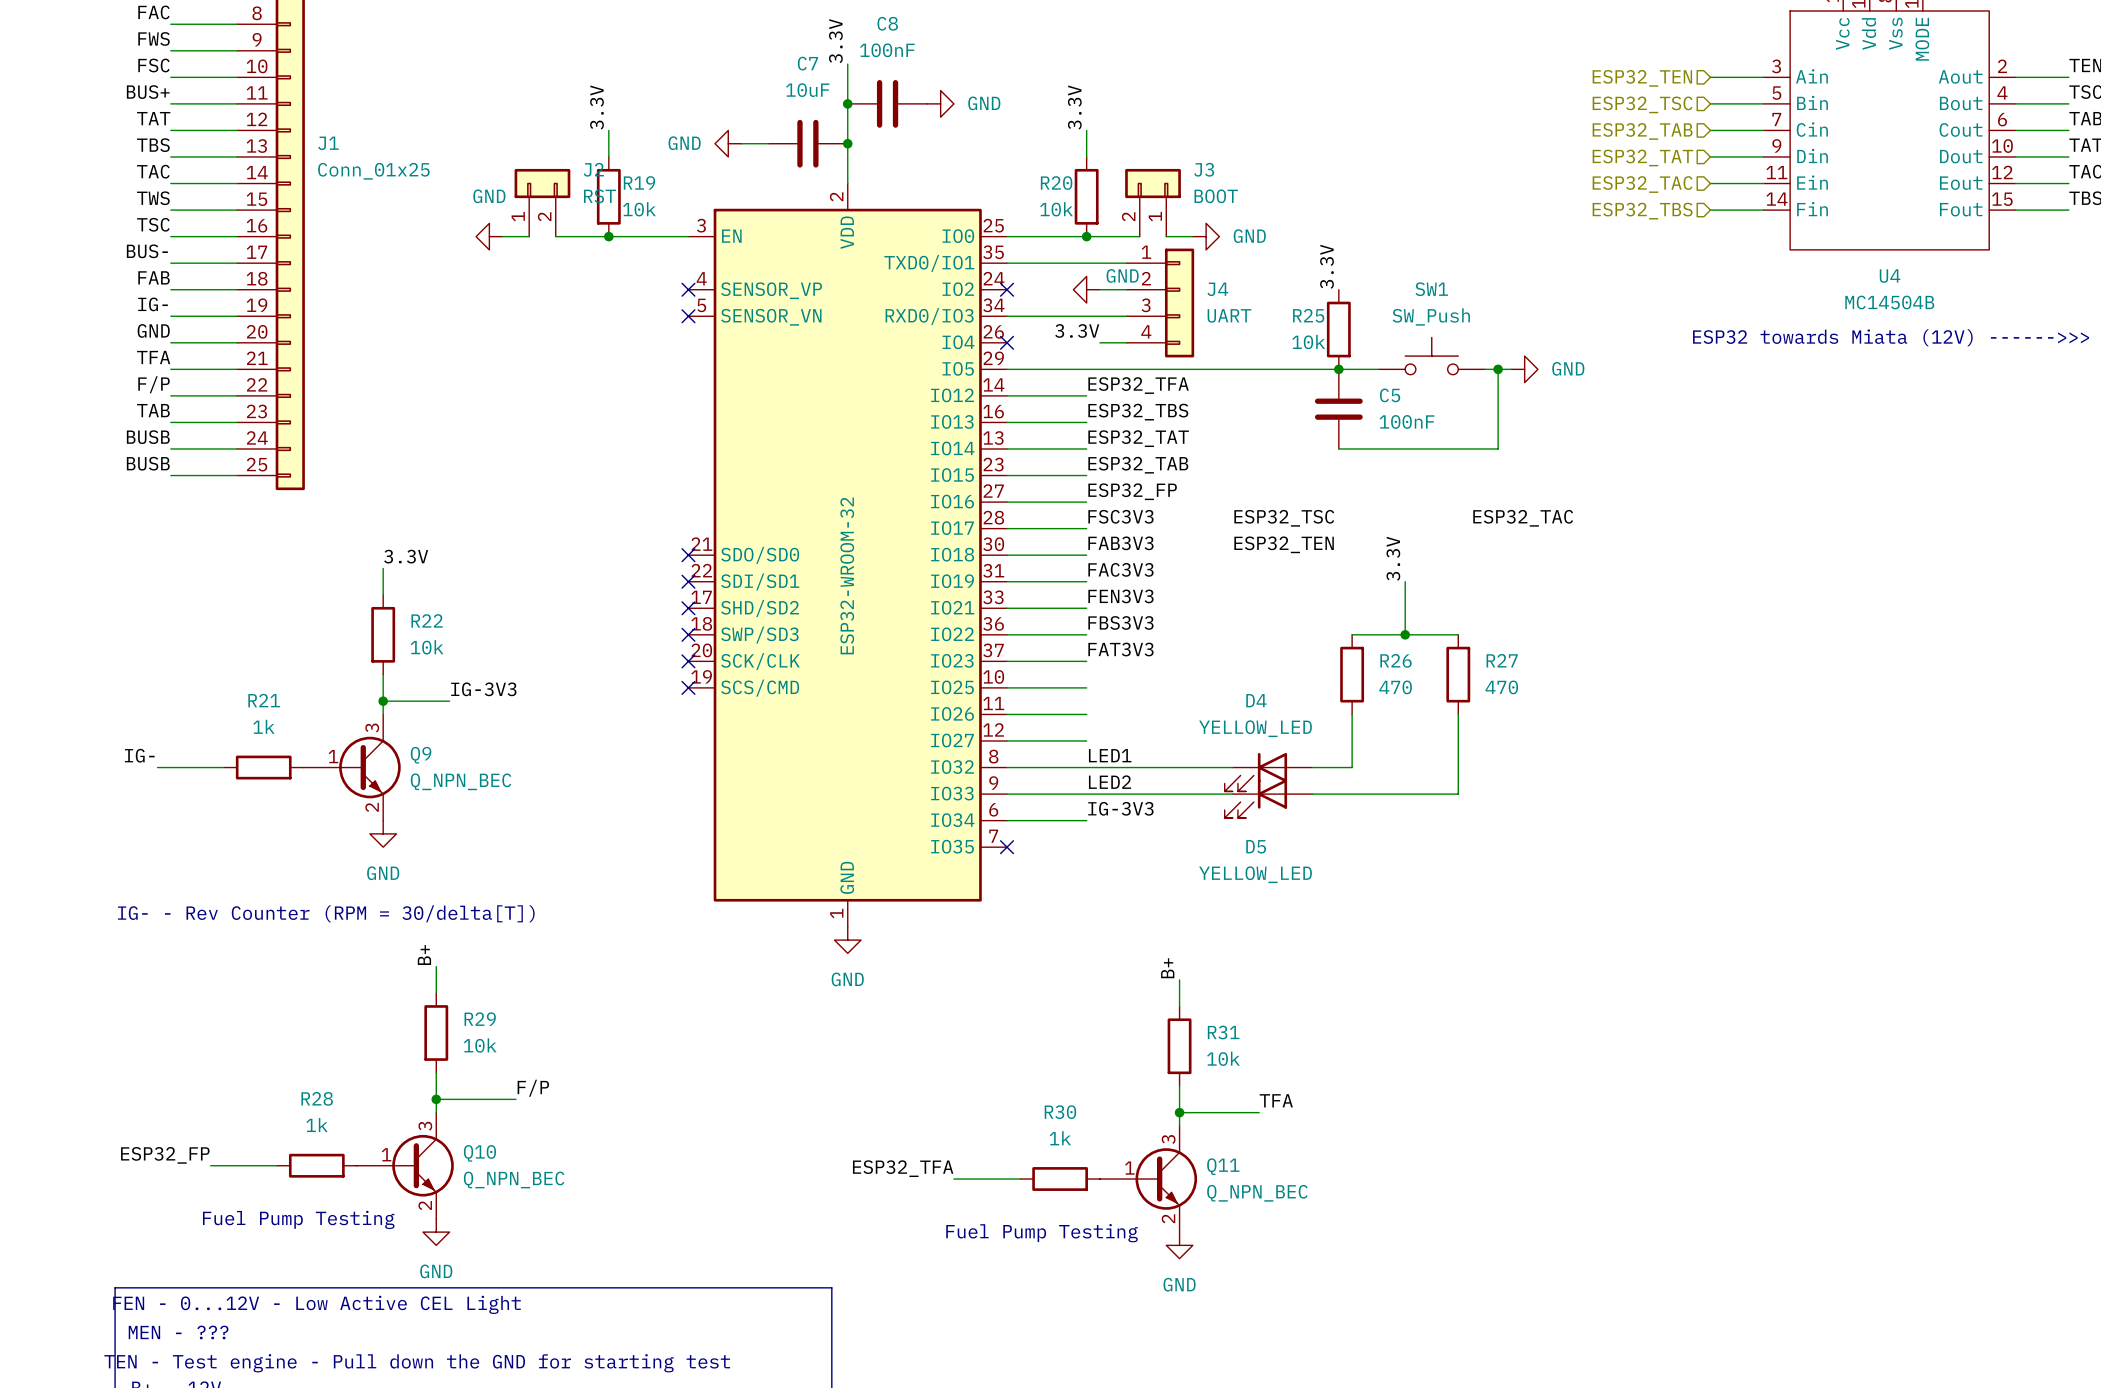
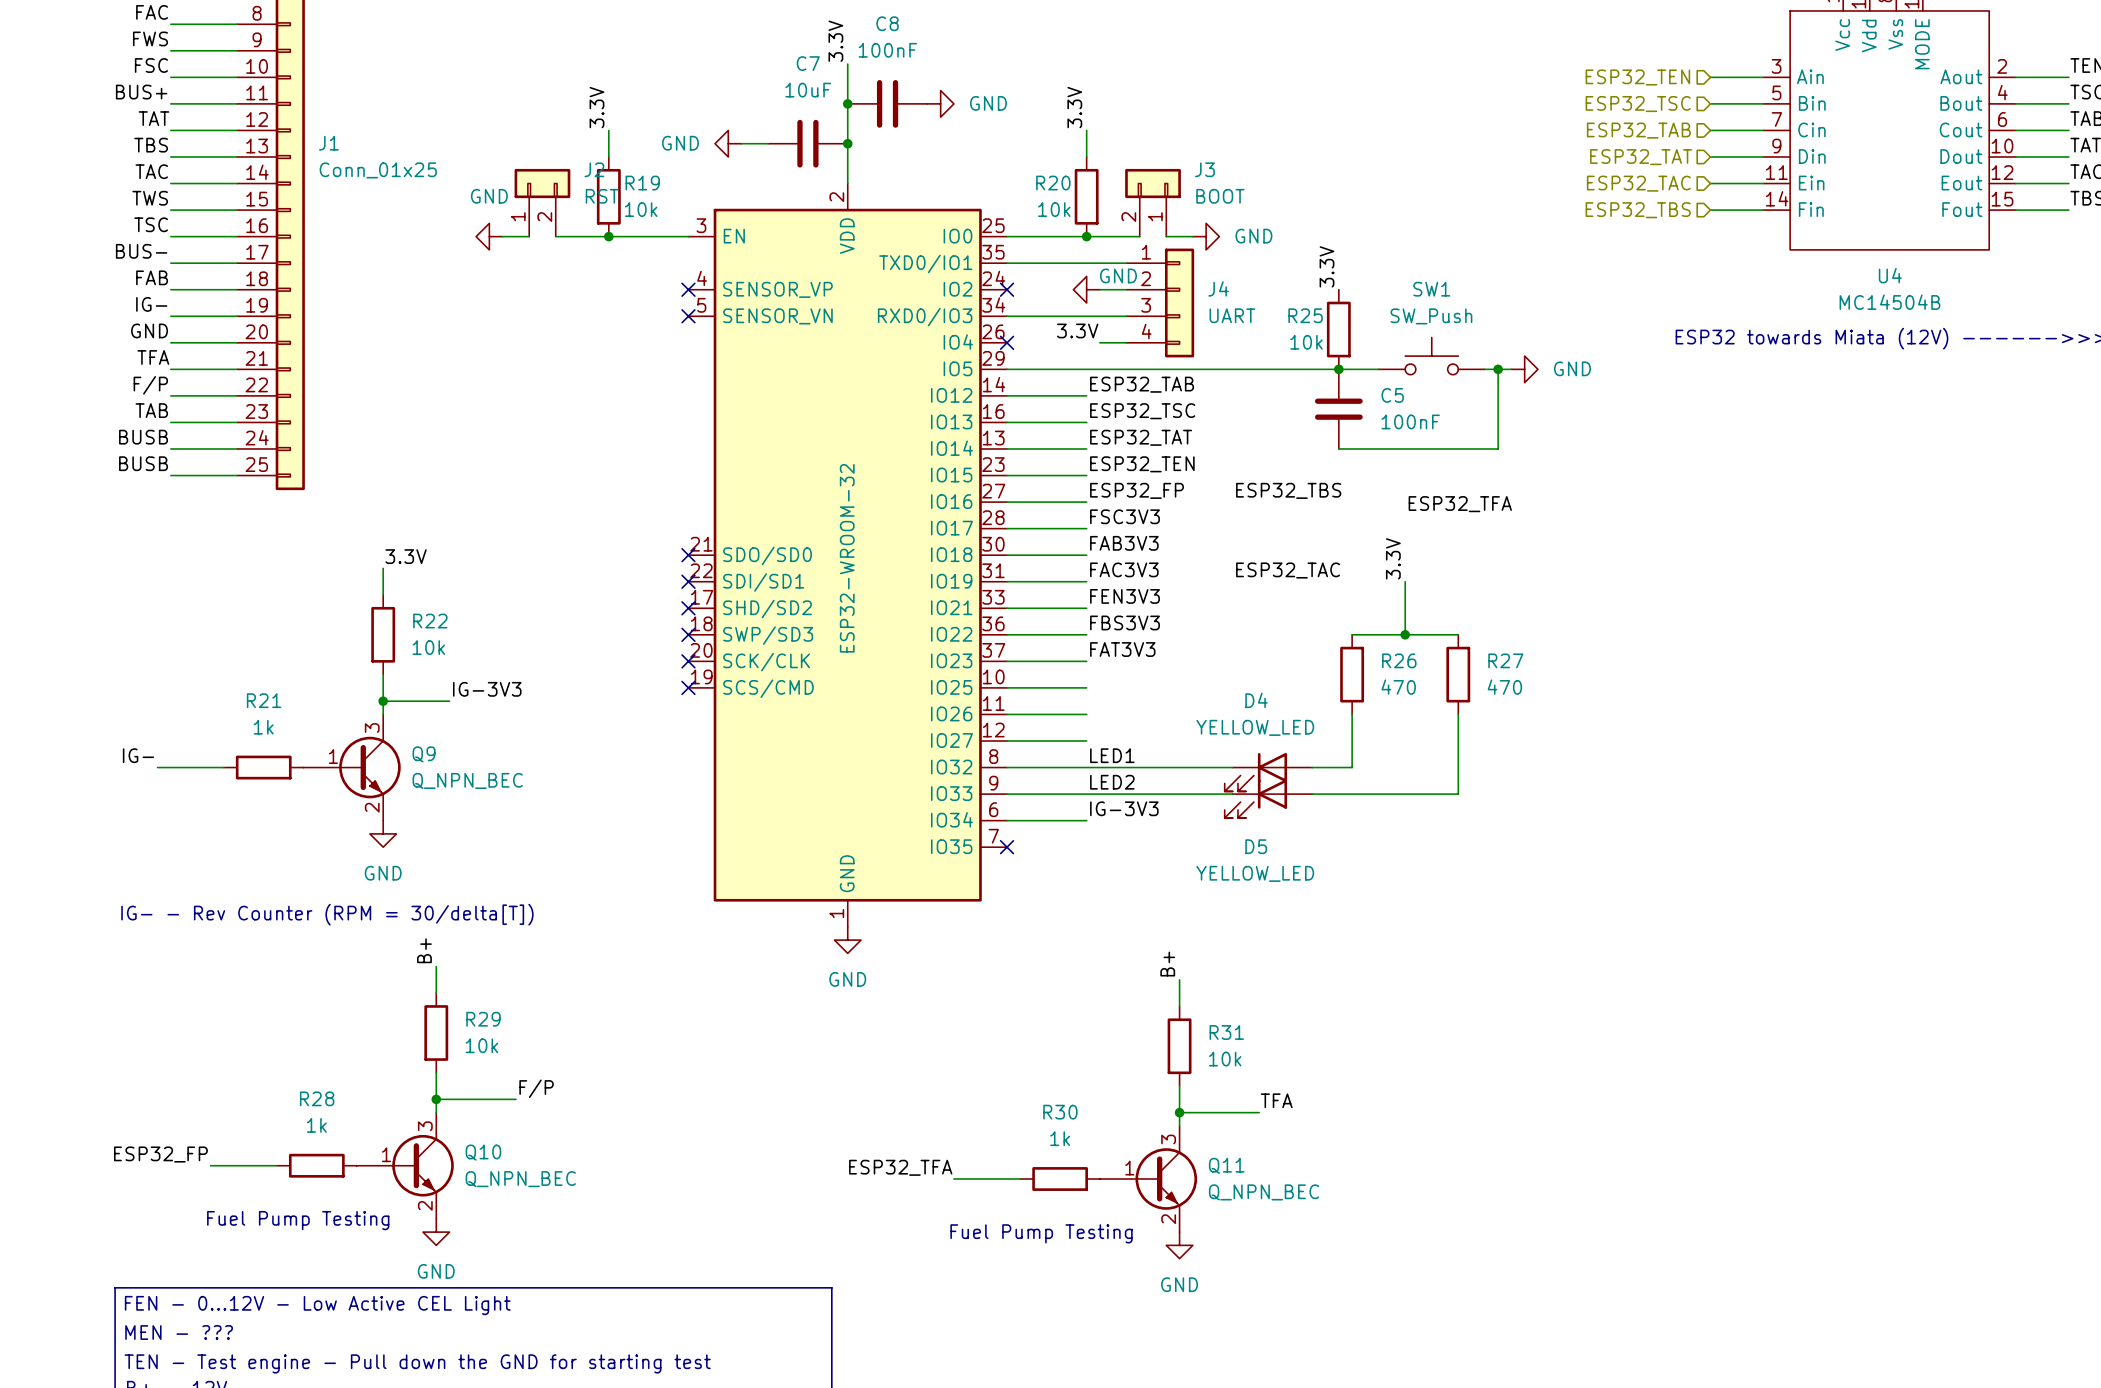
label: ESP32_TFA (1138, 385) -> ESP32_TAB (1142, 384)
label: ESP32_TBS (1138, 412) -> ESP32_TSC (1142, 411)
label: ESP32_TAB (1138, 465) -> ESP32_TEN (1142, 464)
label: none -> ESP32_TFA (1460, 504)
label: ESP32_TSC (1284, 518) -> ESP32_TBS (1288, 490)
label position: ESP32_TAC (1523, 518) -> ESP32_TAC (1288, 570)
label: ESP32_TEN (1284, 544) -> none

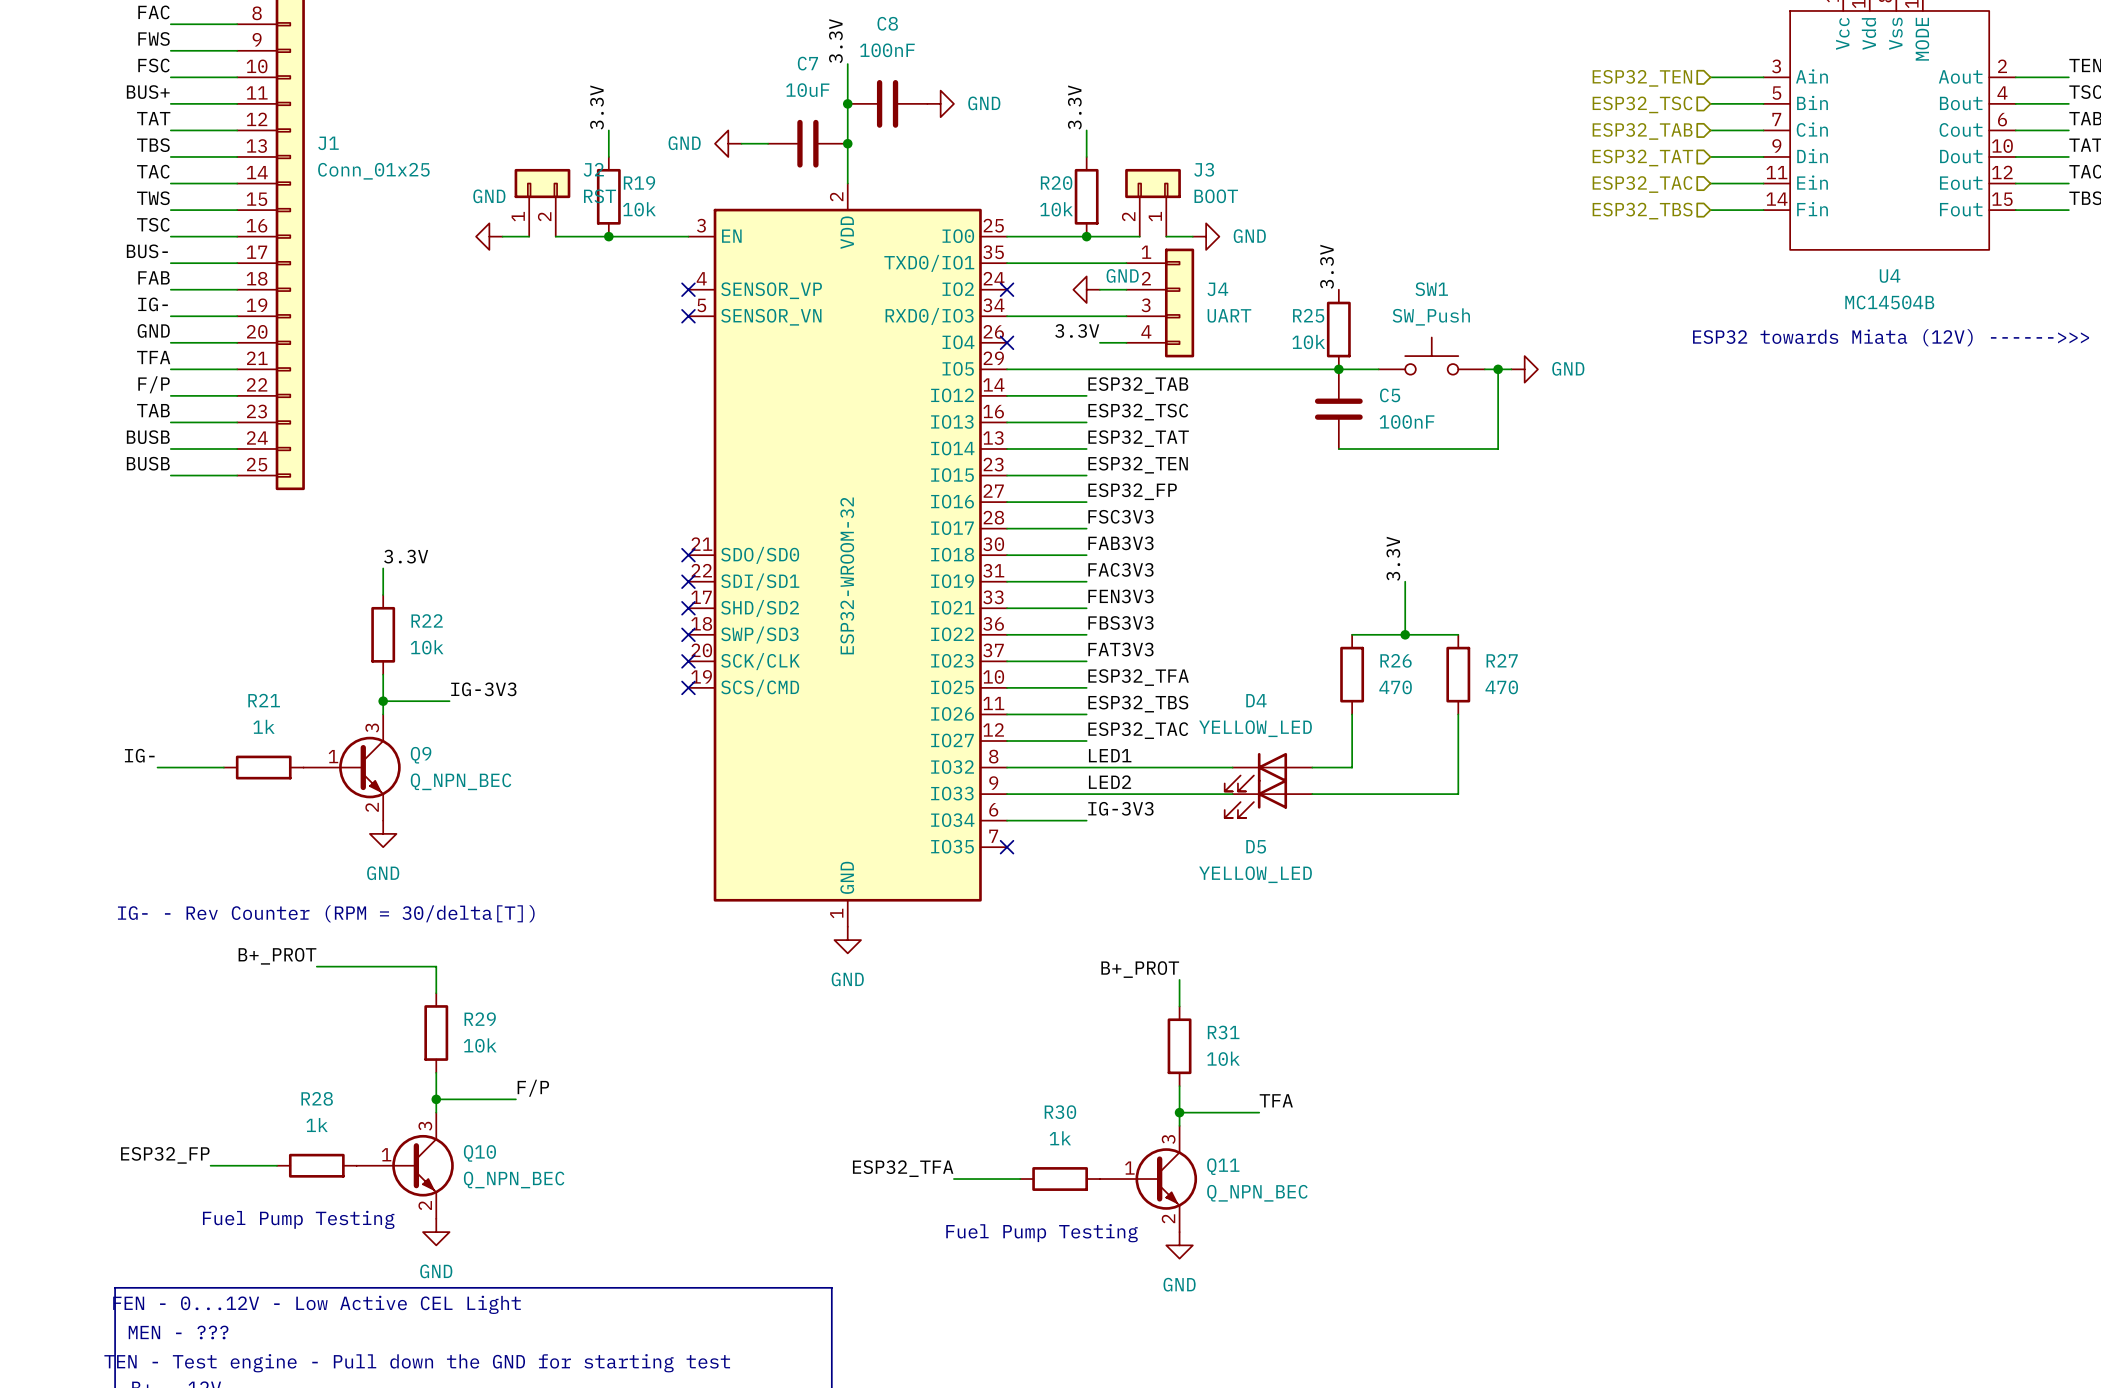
label position: ESP32_TBS (1288, 490) -> ESP32_TBS (1138, 704)
label: ESP32_TFA (1460, 504) -> none
label position: ESP32_TAC (1288, 570) -> ESP32_TAC (1138, 730)
label: none -> ESP32_TFA (1138, 677)
label: B+ (424, 950) -> none
label: none -> B+_PROT (277, 956)
label: B+ (1167, 964) -> B+_PROT (1140, 969)
wire: none -> (316, 966) (436, 966)

